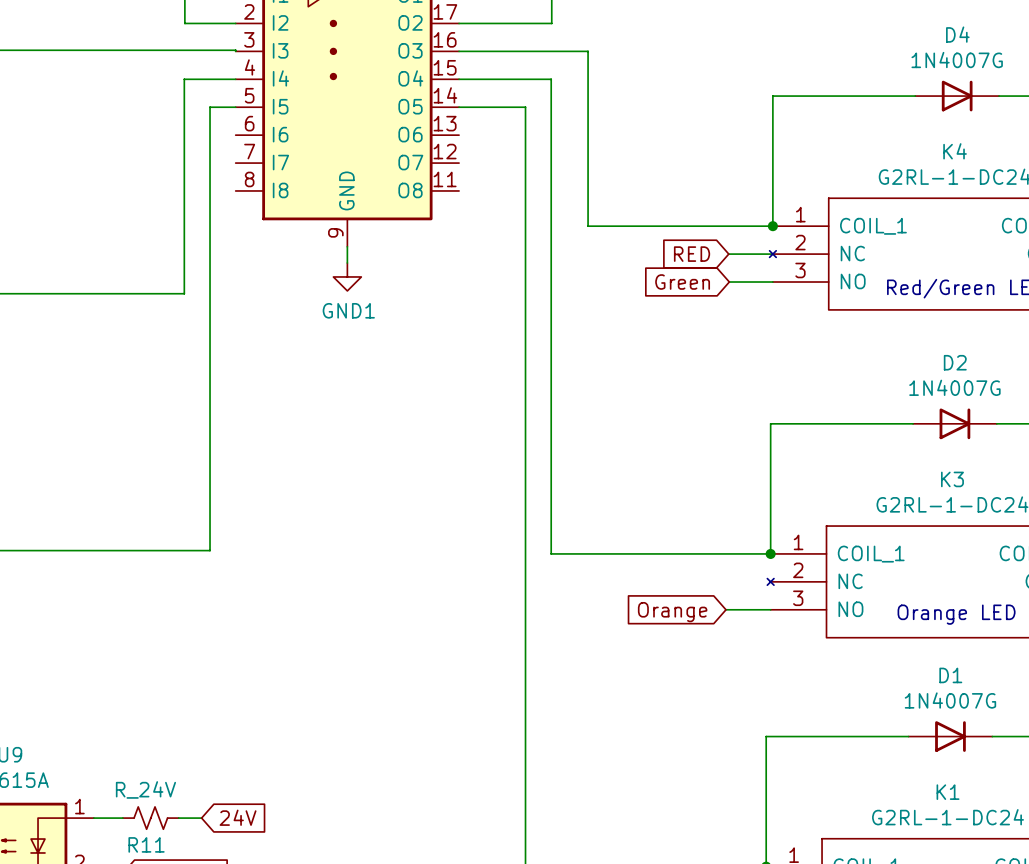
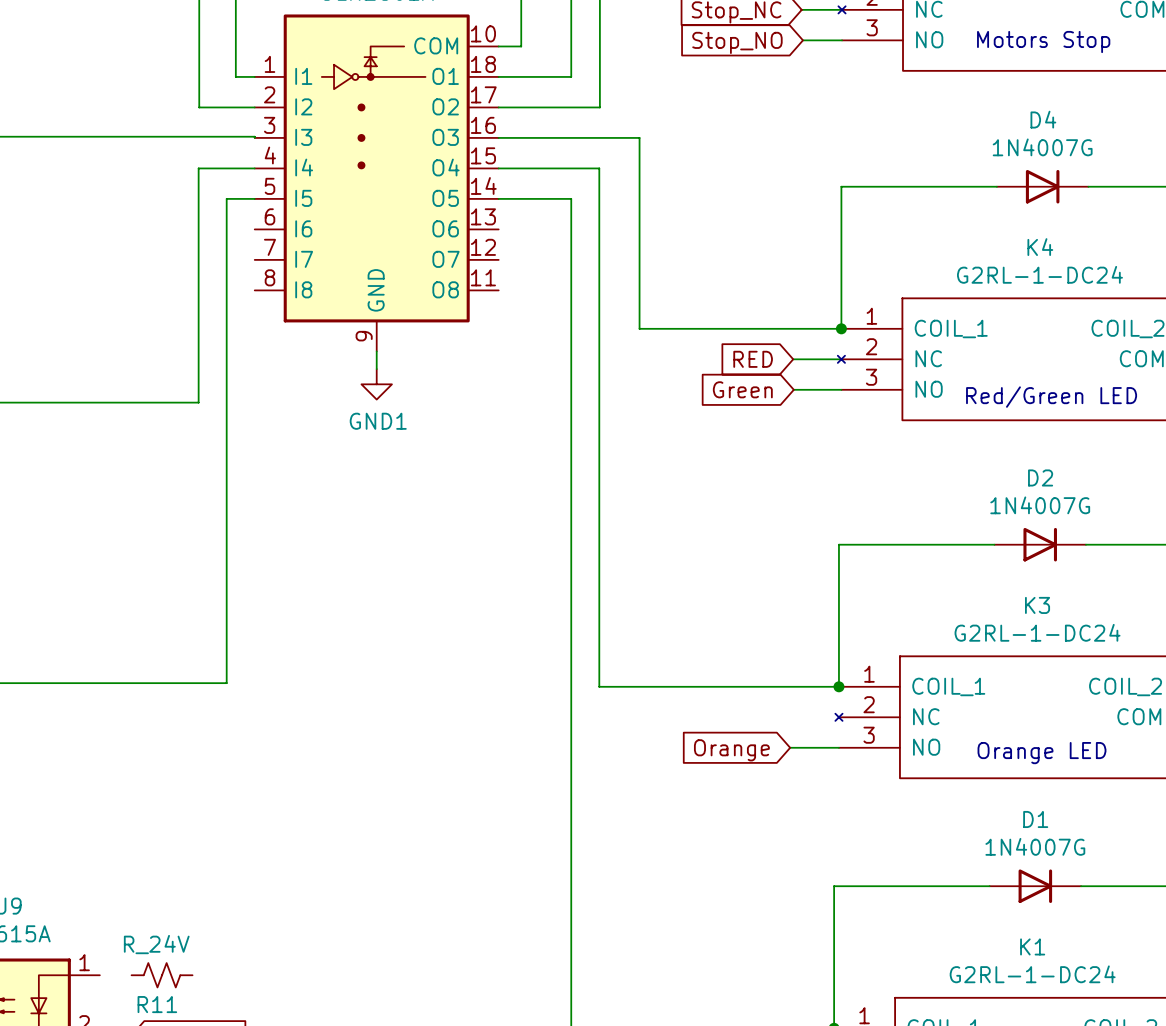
global label: 24V (238, 817) -> none
wire: (93, 818) (122, 818) -> none
wire: (178, 818) (202, 818) -> none

